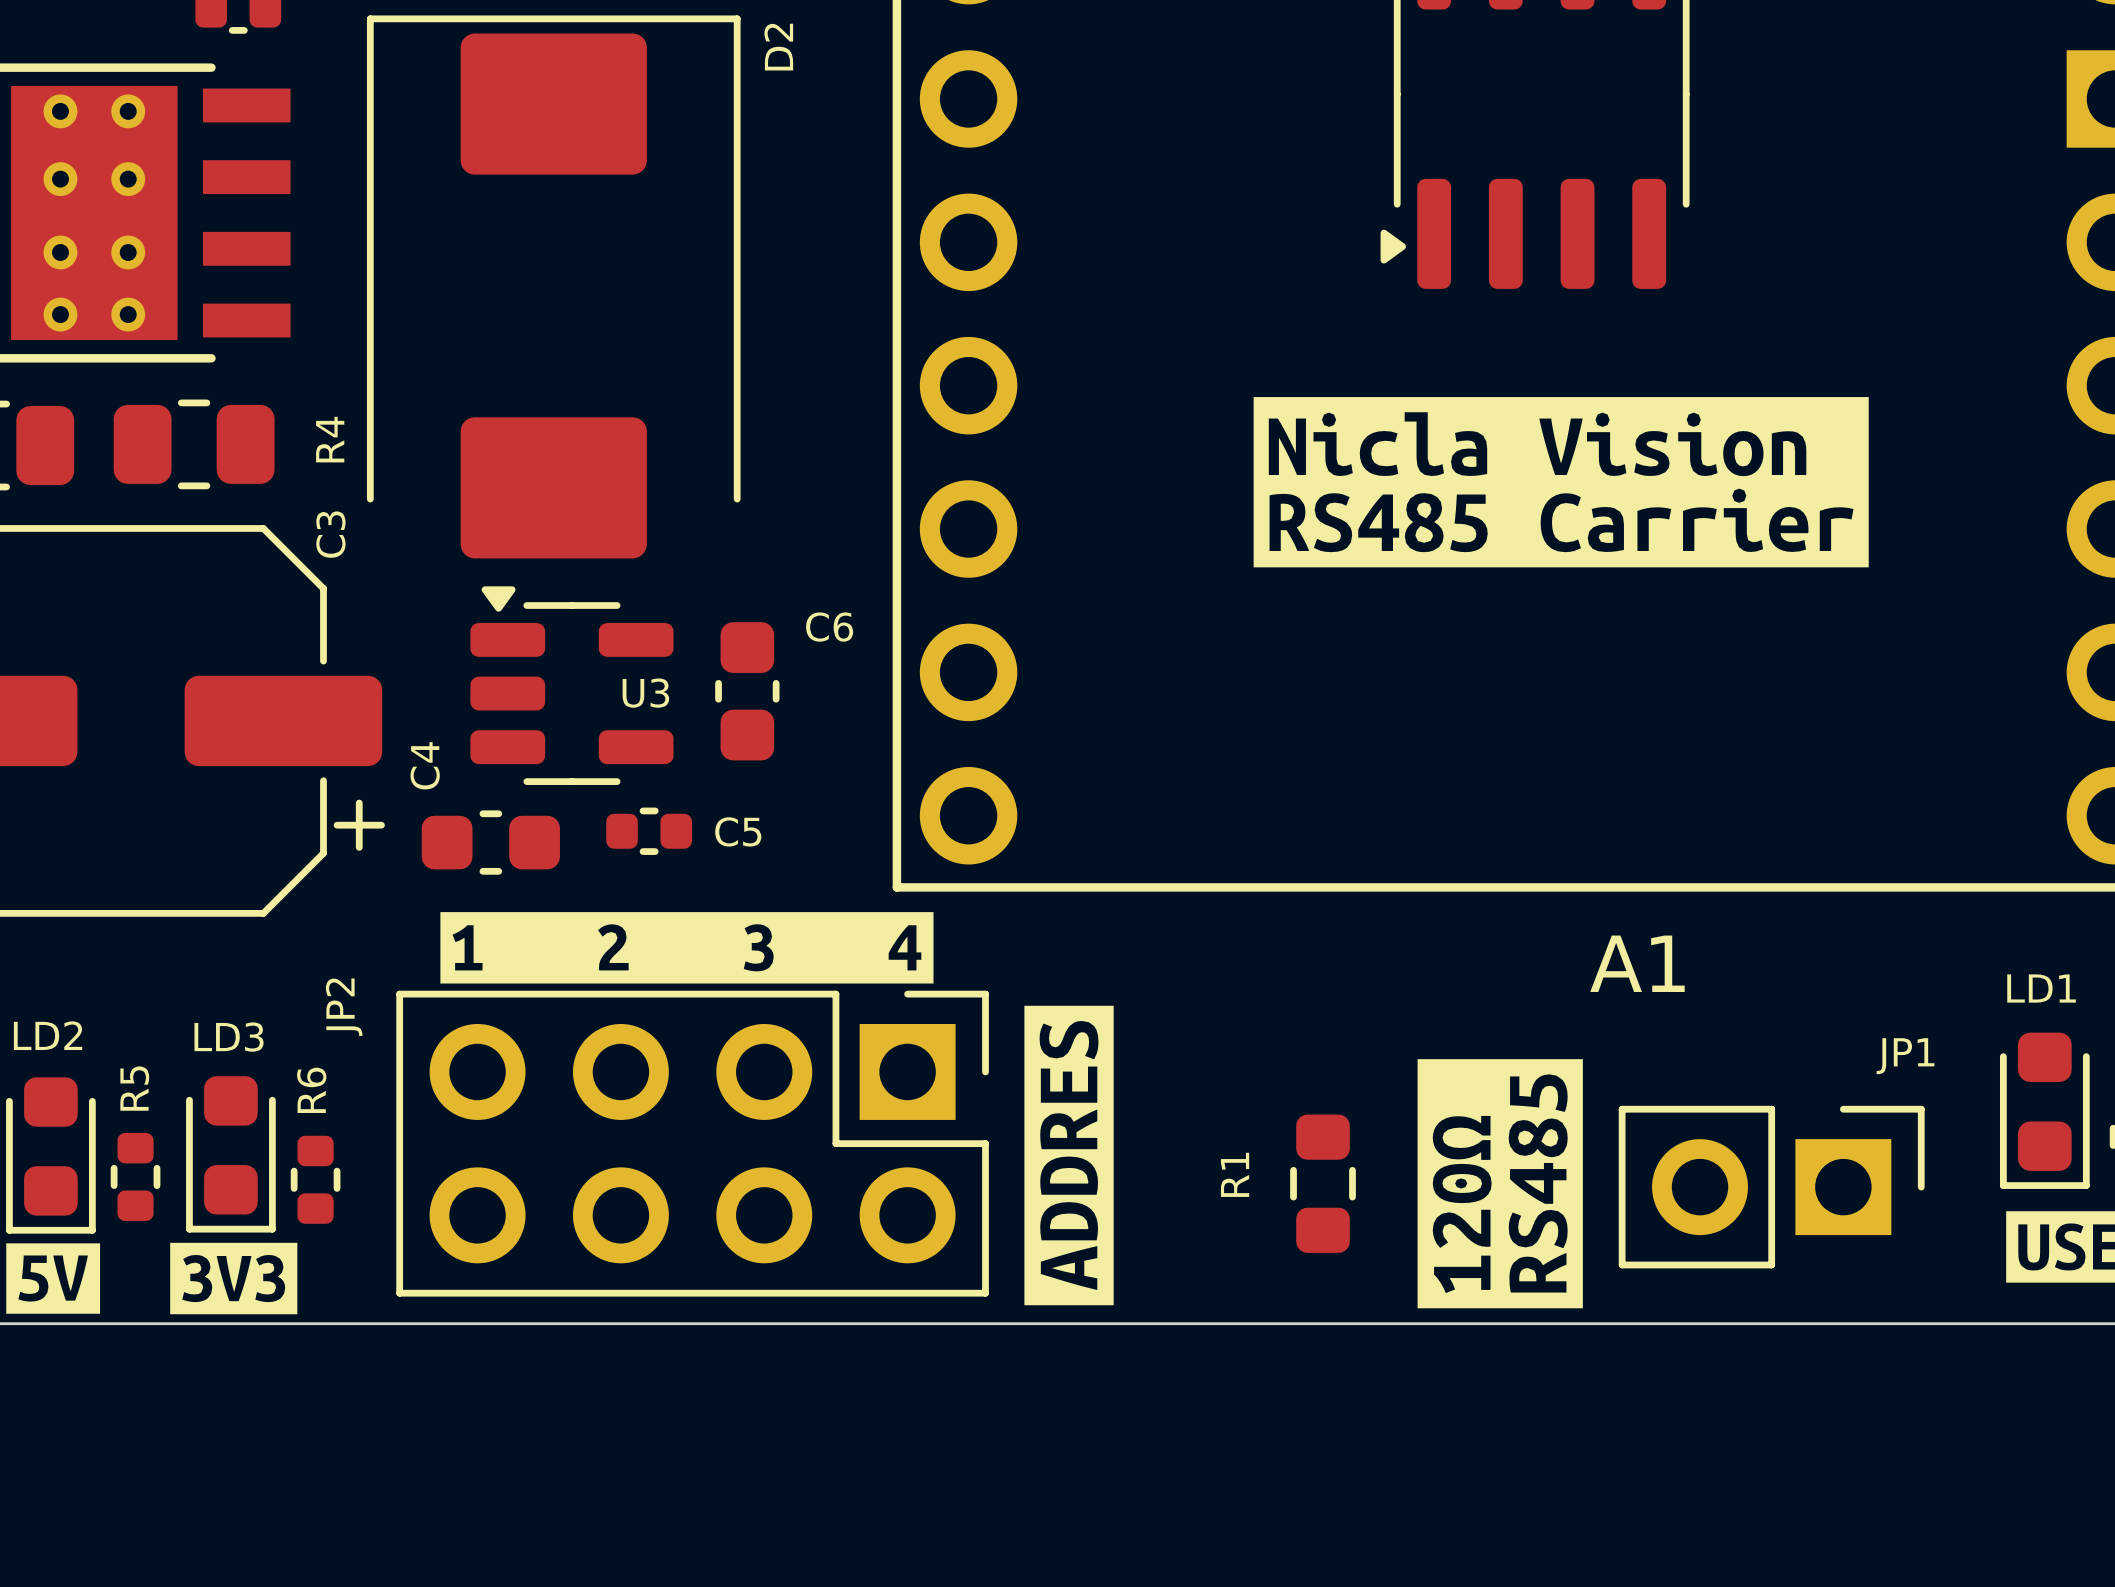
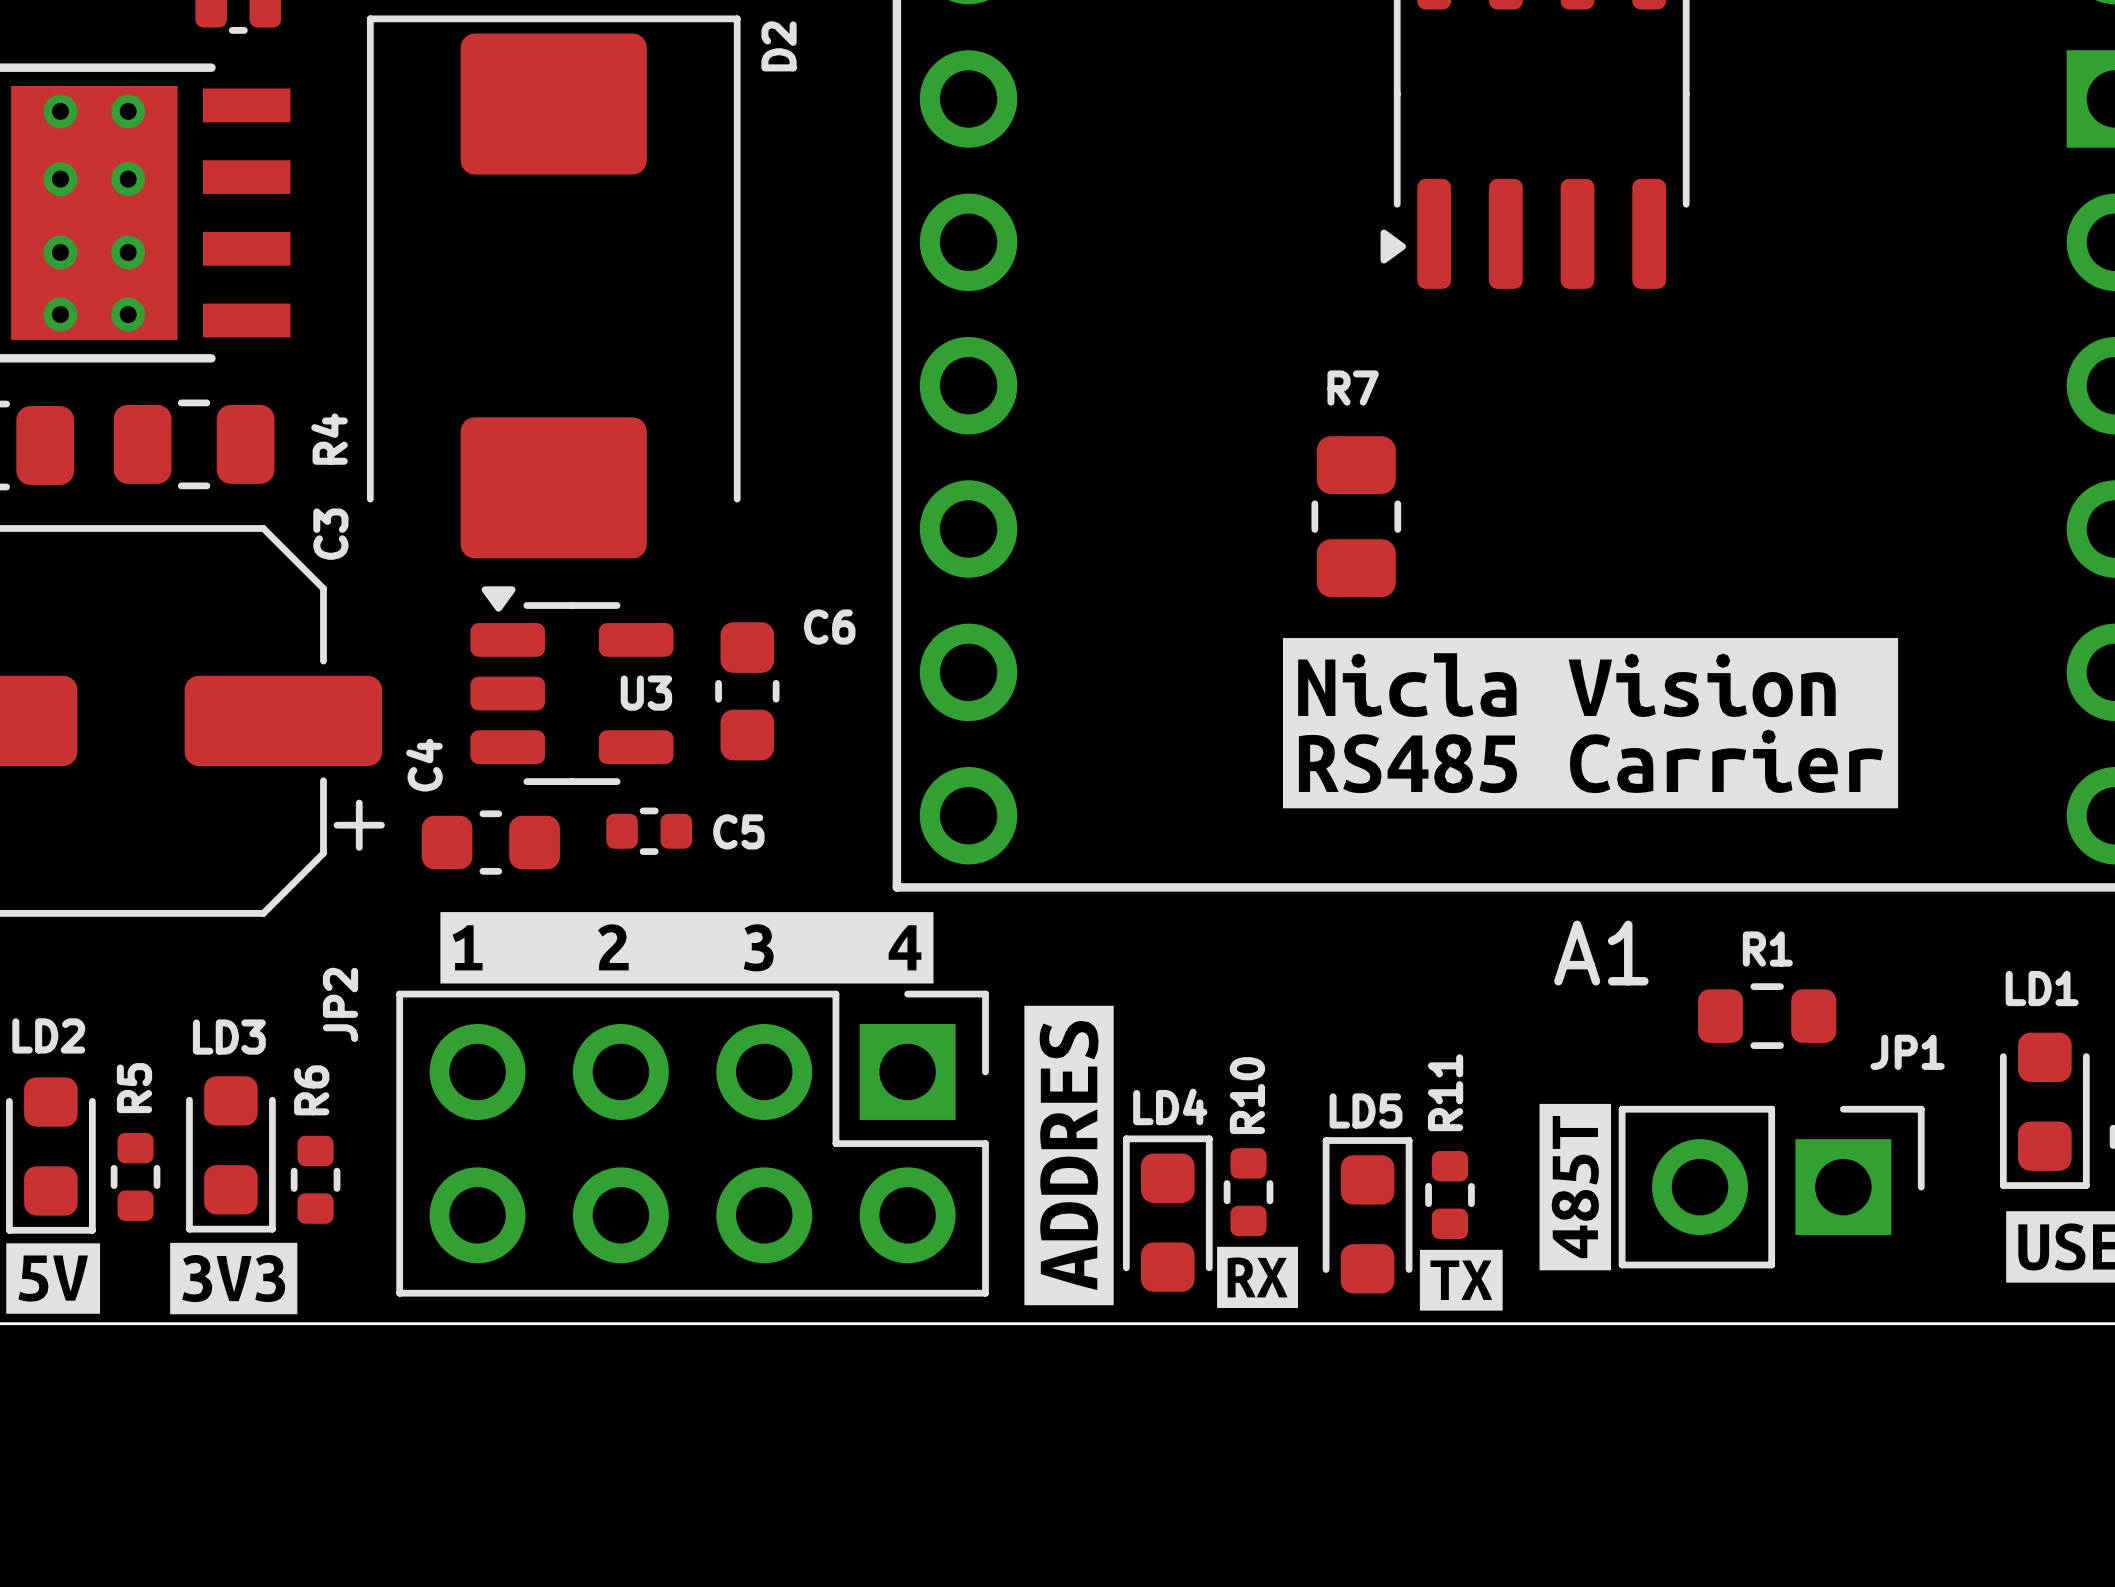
drawing position: (1561, 482) -> (1590, 723)
R7: none -> (1356, 516)
A1 name position: A1 (1637, 963) -> A1 (1601, 953)
drawing: [1417, 1059, 1583, 1309] -> none
drawing: none -> [1419, 1103, 1612, 1311]
R1 rotation: 0° (1323, 1183) -> 90° clockwise (1767, 1016)
R1 position: (1323, 1183) -> (1767, 1016)
R10: none -> (1248, 1192)
R11: none -> (1449, 1195)
LD4: none -> (1167, 1213)
LD5: none -> (1367, 1215)
drawing: none -> [1217, 1246, 1299, 1309]

